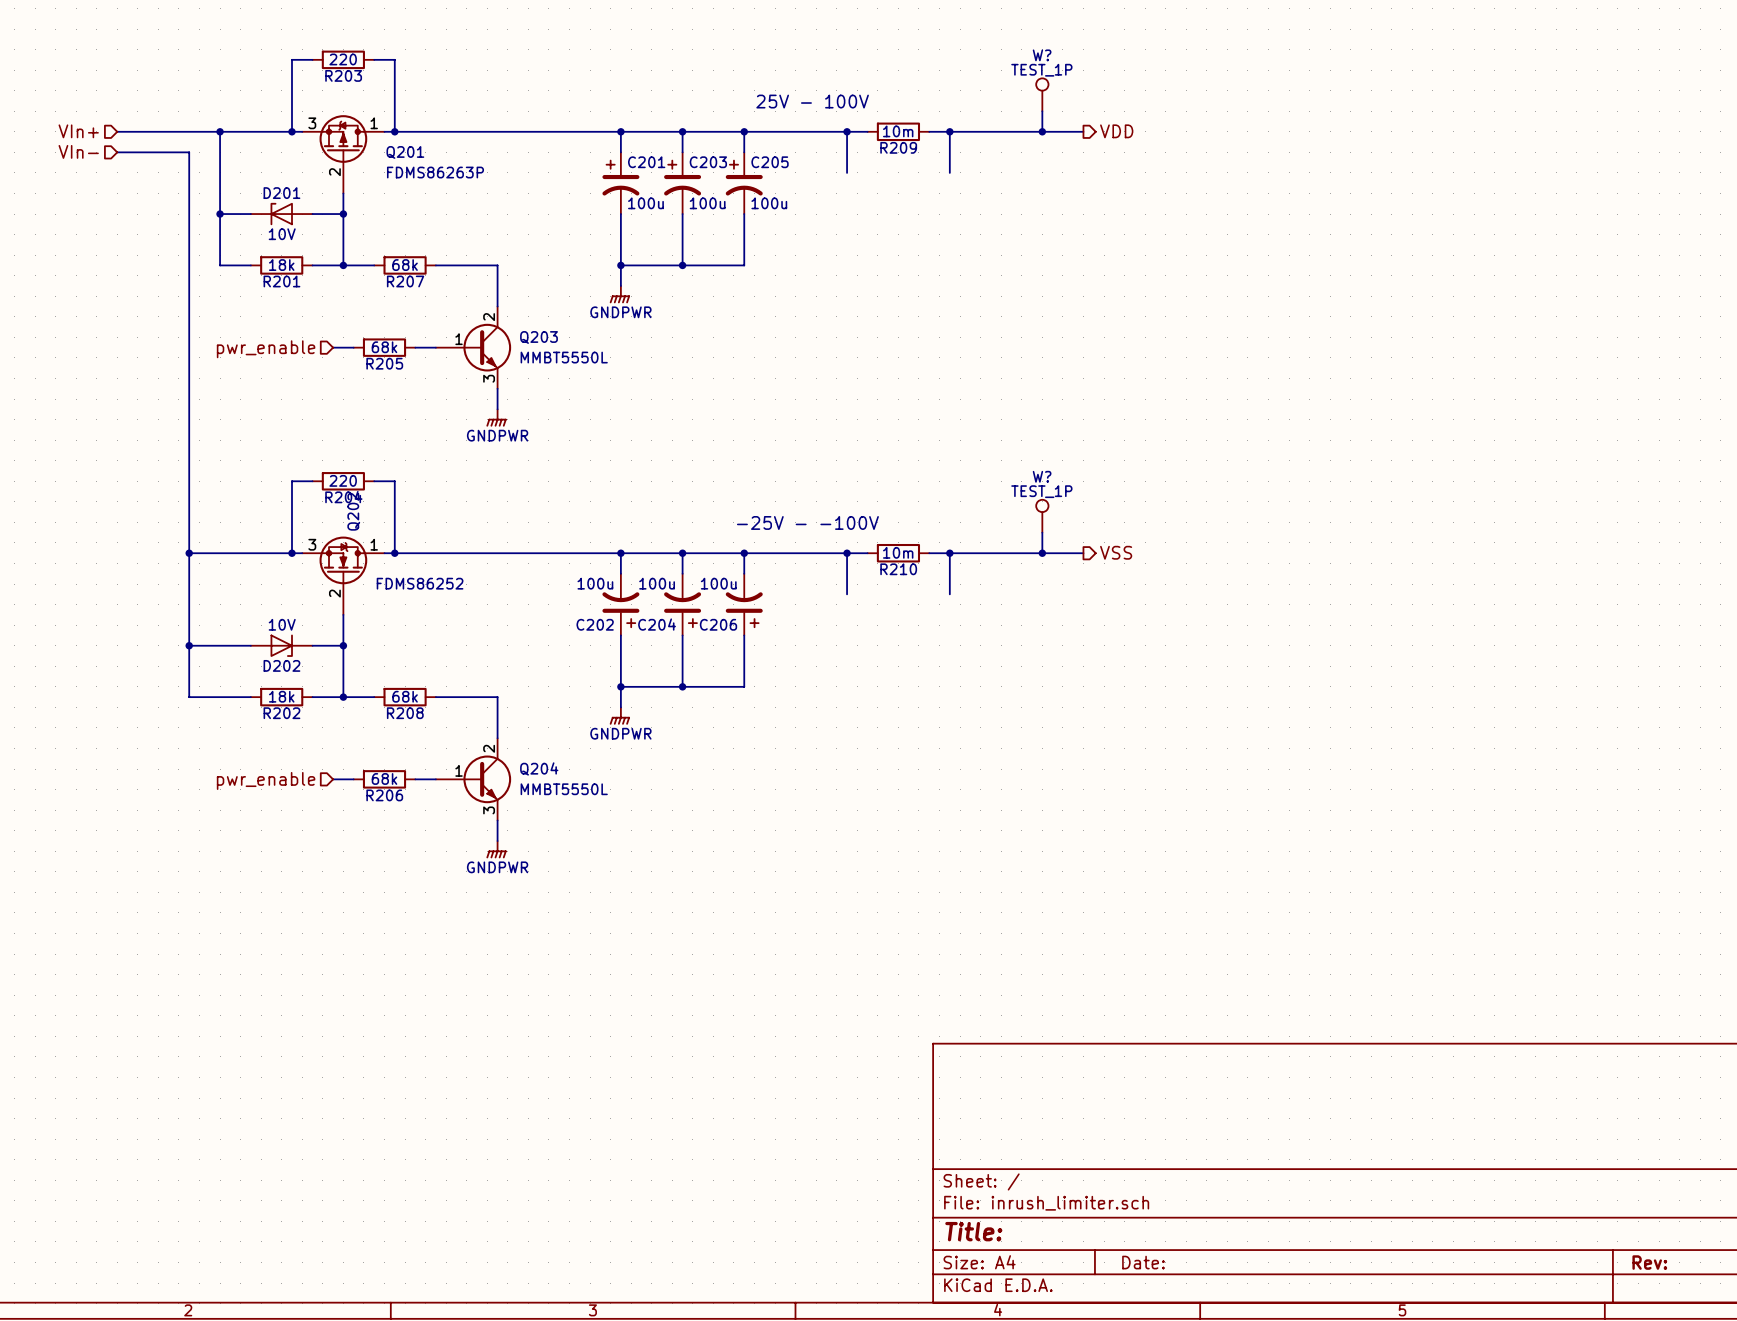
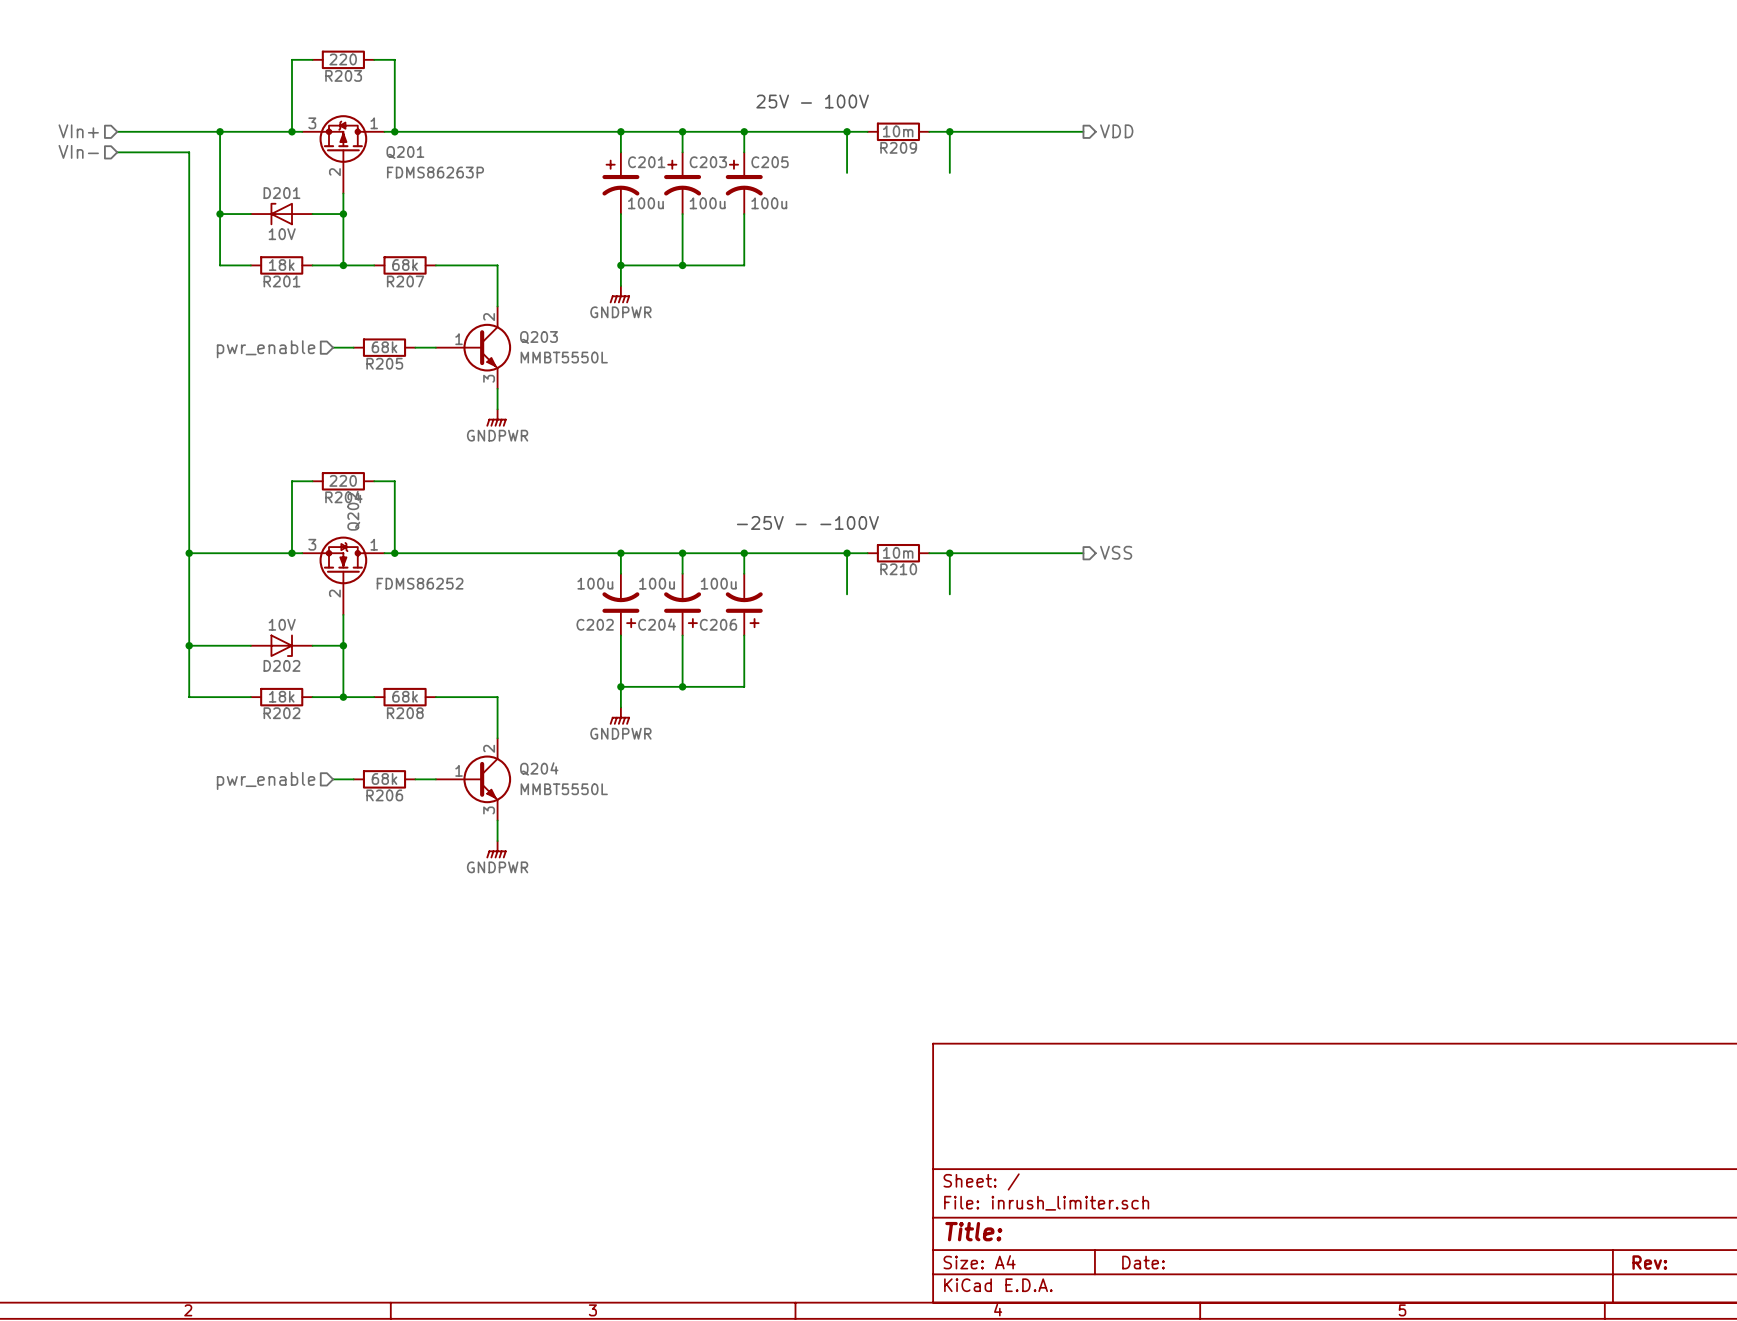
W?: TEST_1P (1042, 94) -> none
wire: (1042, 111) (1042, 131) -> none
junction: (1042, 131) -> none
W?: TEST_1P (1042, 516) -> none
wire: (1042, 532) (1042, 553) -> none
junction: (1042, 553) -> none

